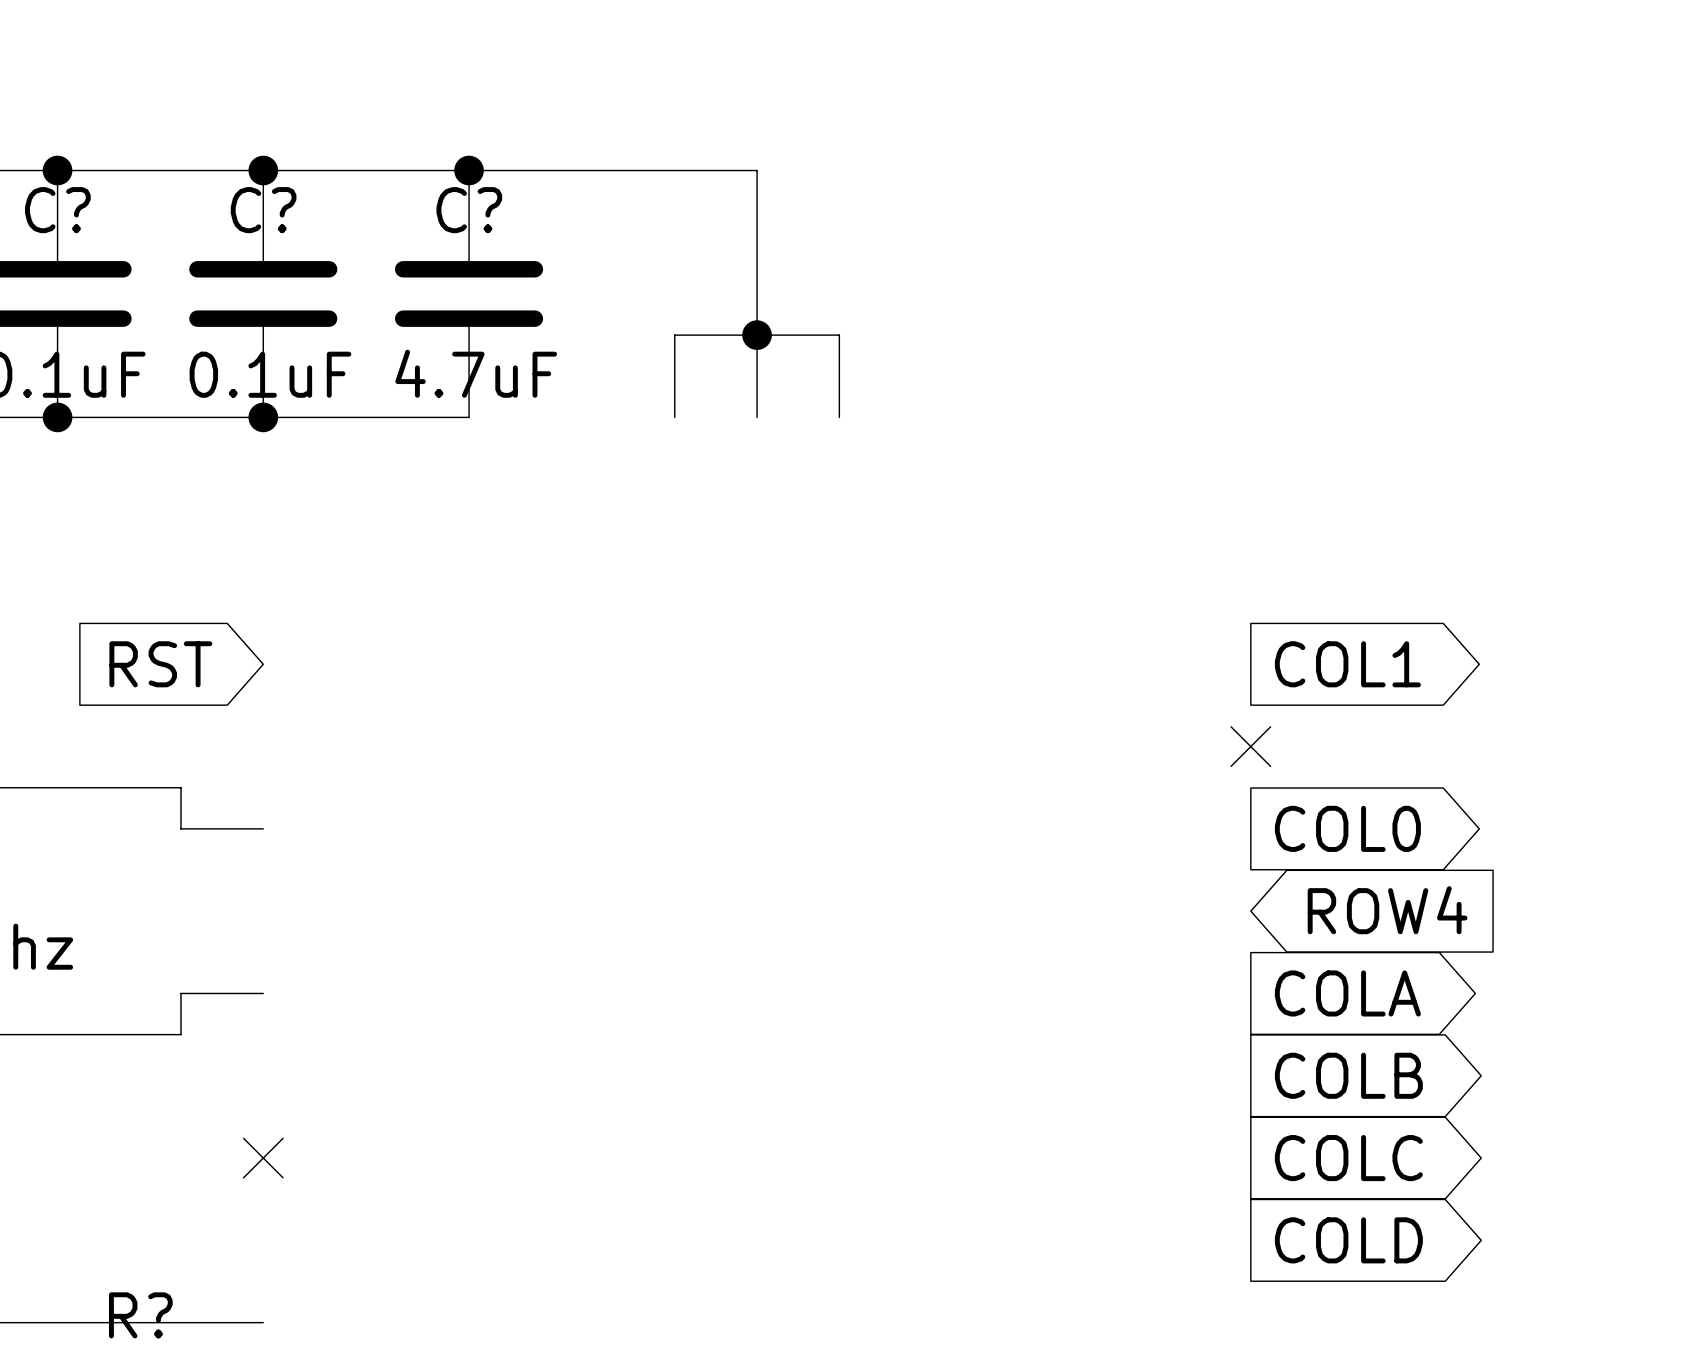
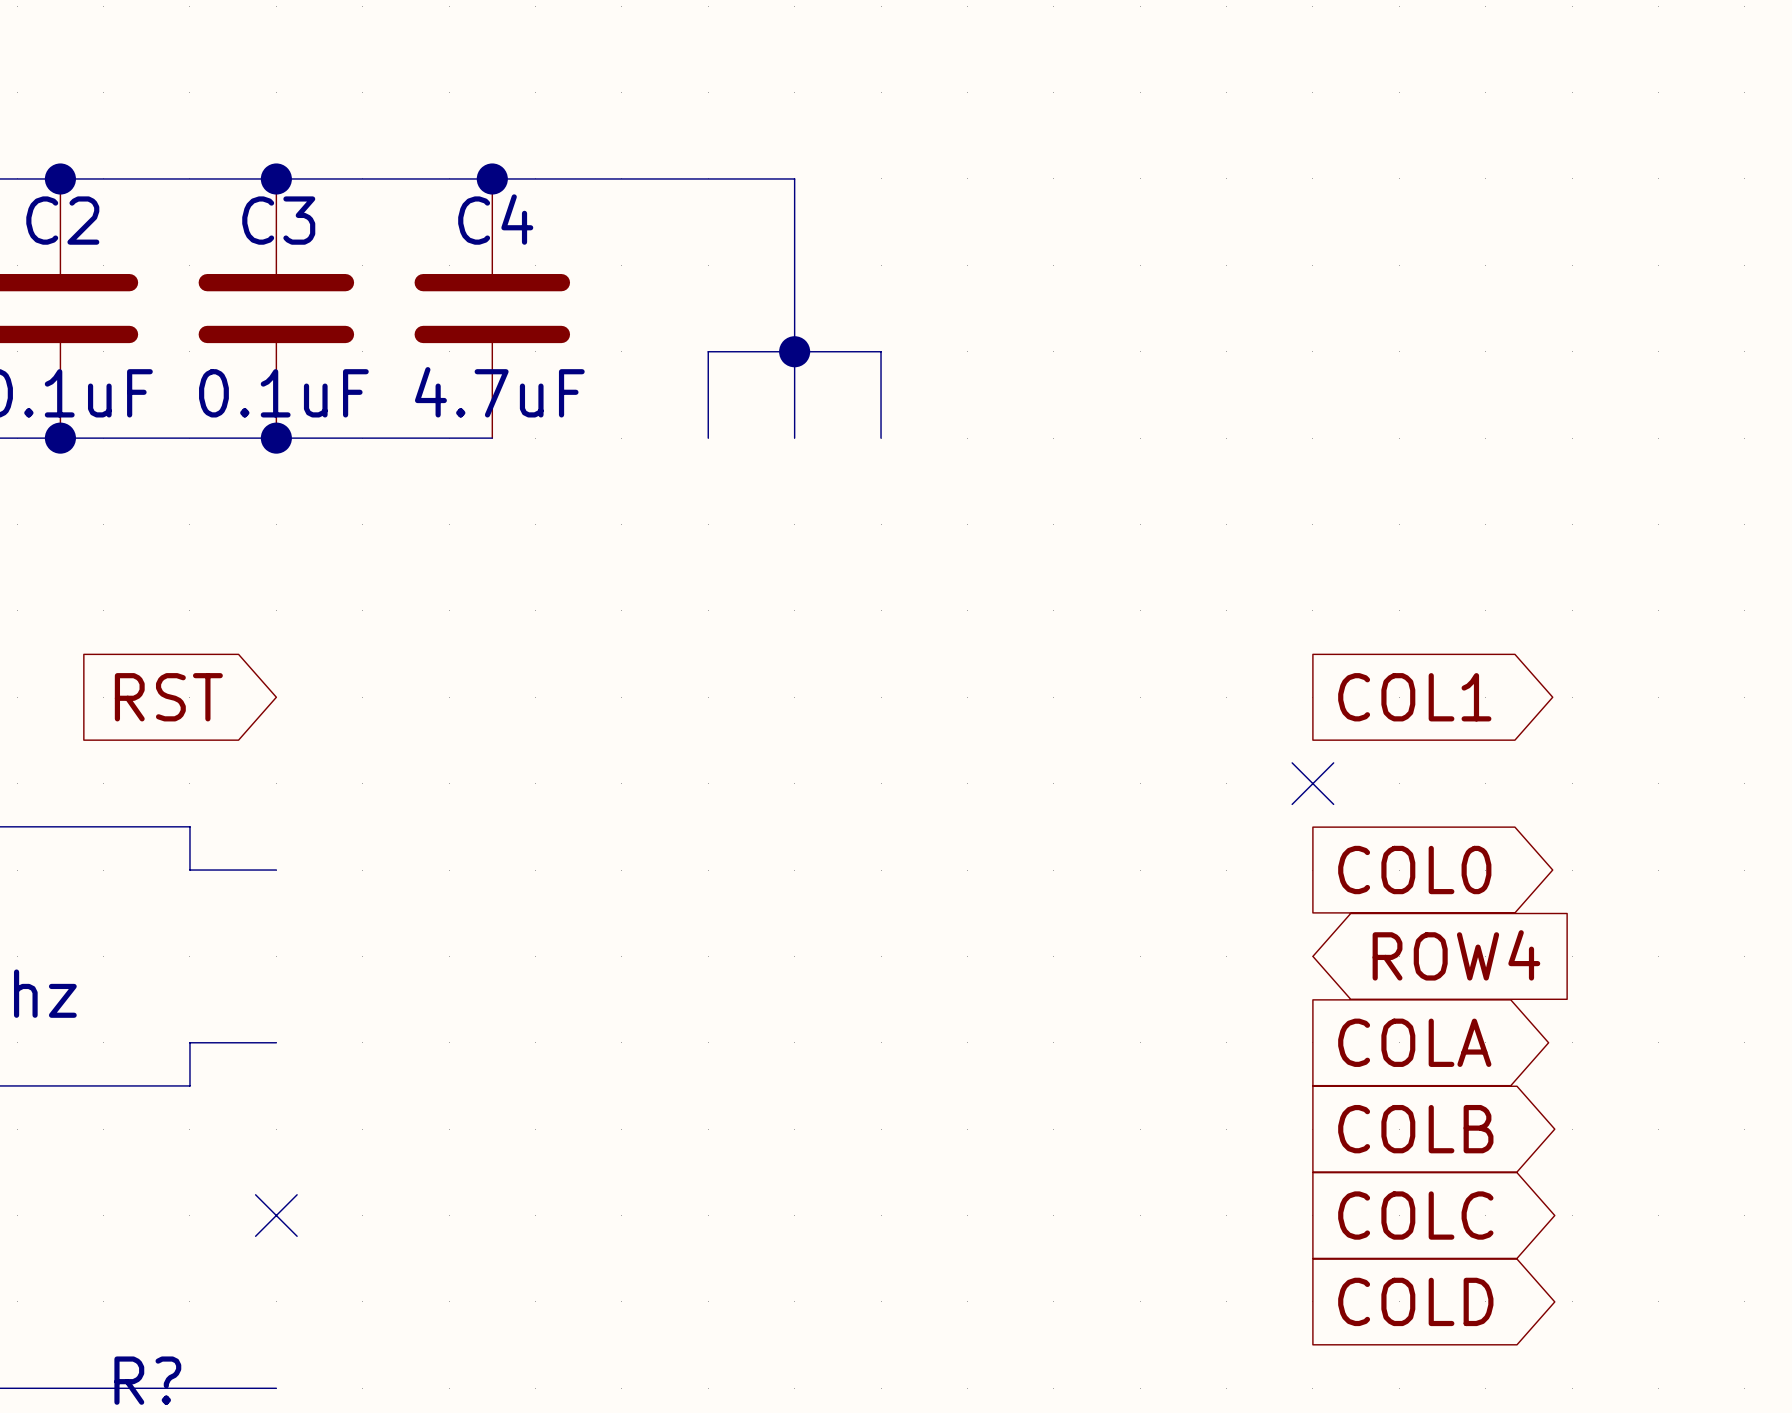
C? name: C? (57, 210) -> C2 (62, 220)
C? name: C? (263, 210) -> C3 (278, 220)
C? name: C? (469, 210) -> C4 (495, 219)

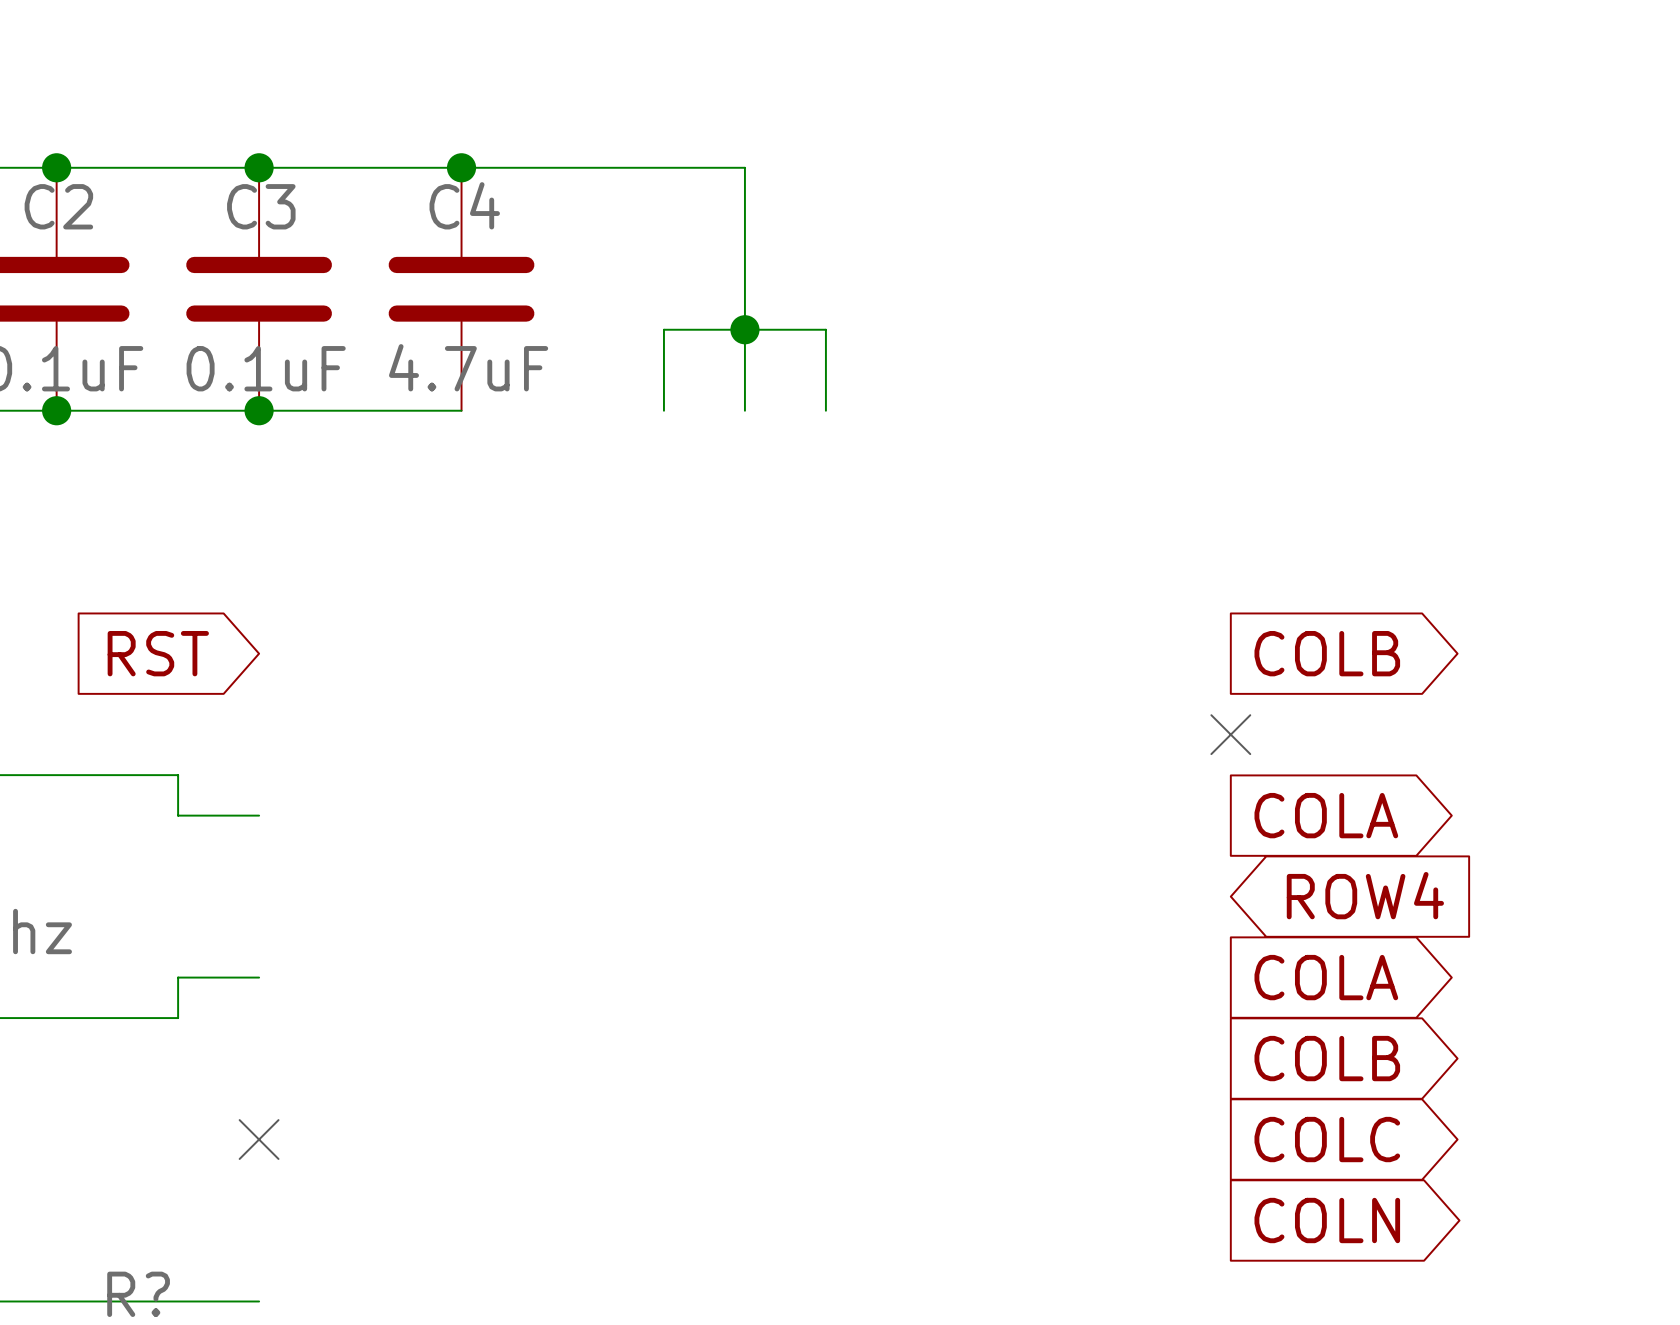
global label: COL1 (1414, 697) -> COLB (1327, 653)
global label: COL0 (1414, 870) -> COLA (1326, 815)
global label: COLD (1415, 1301) -> COLN (1327, 1220)

